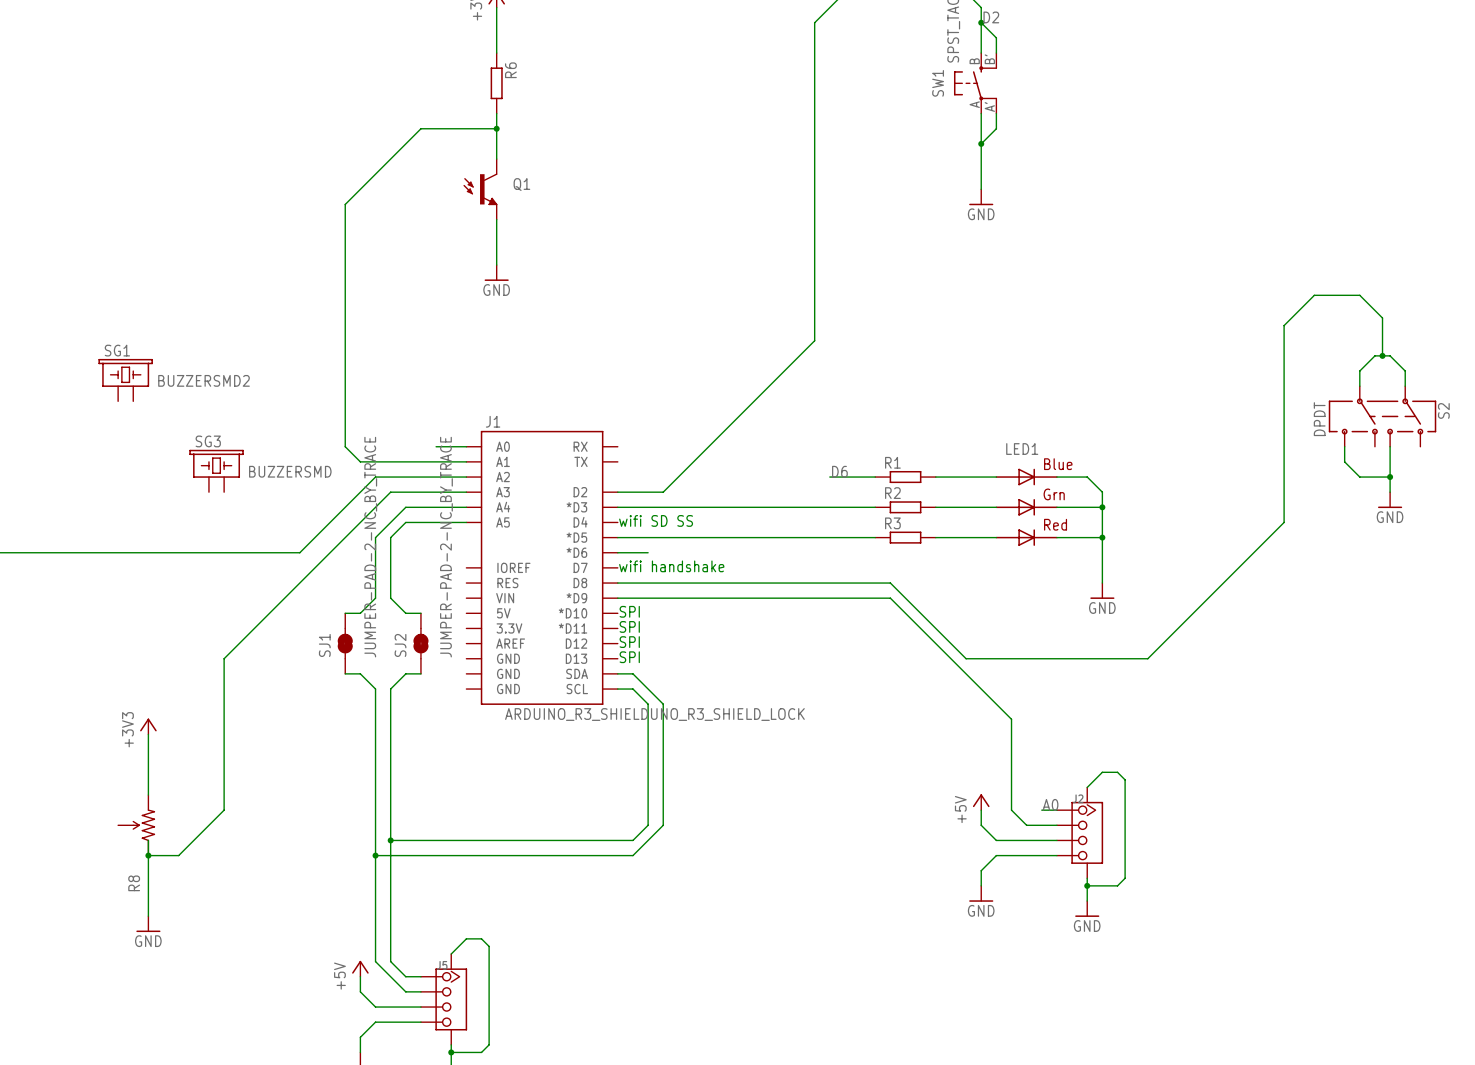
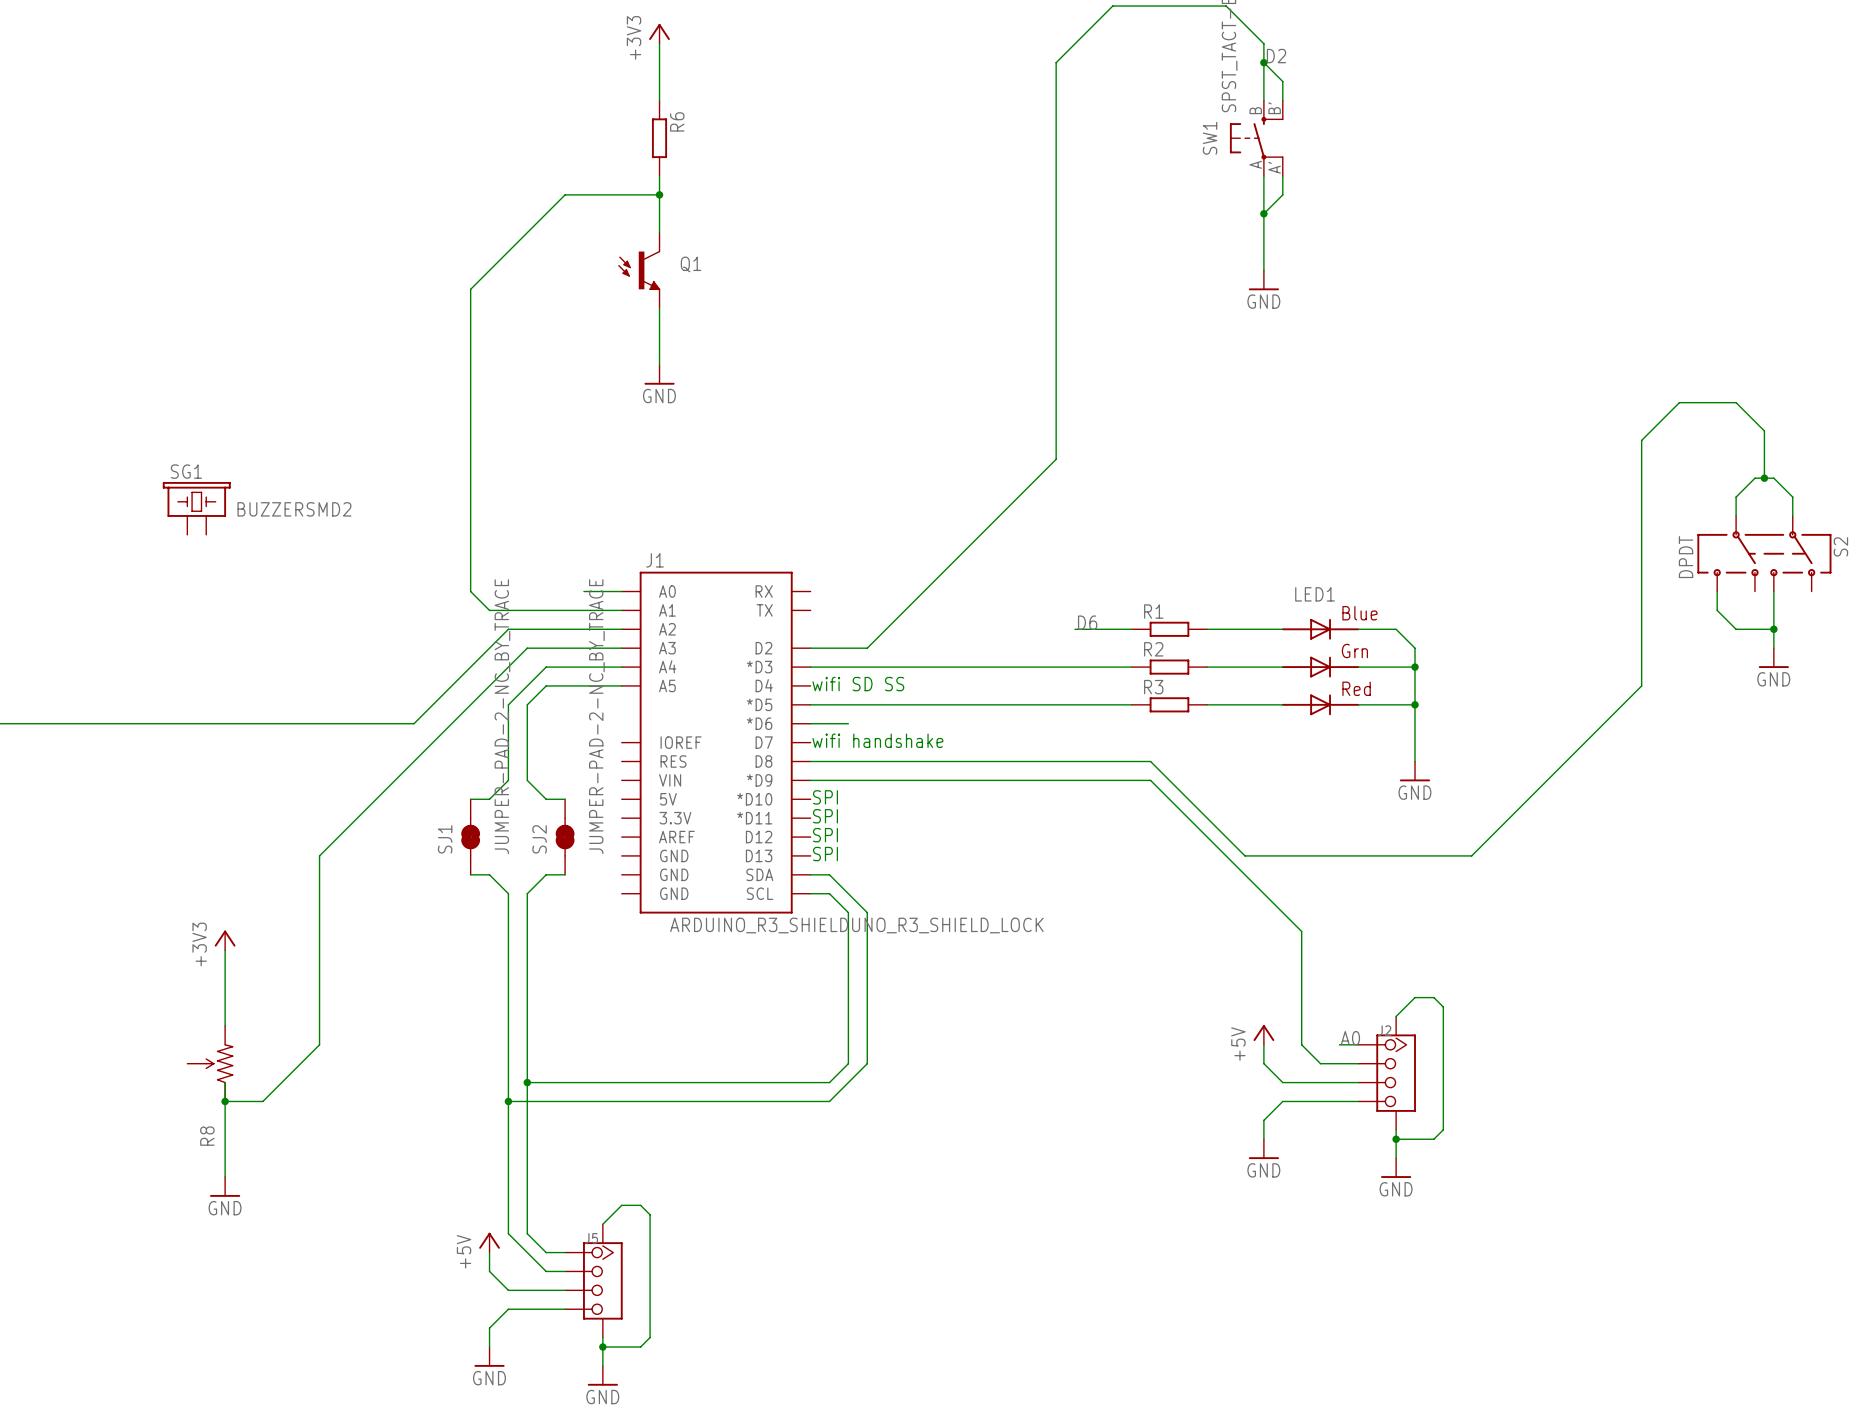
SG3: BUZZERSMD (216, 470) -> none

